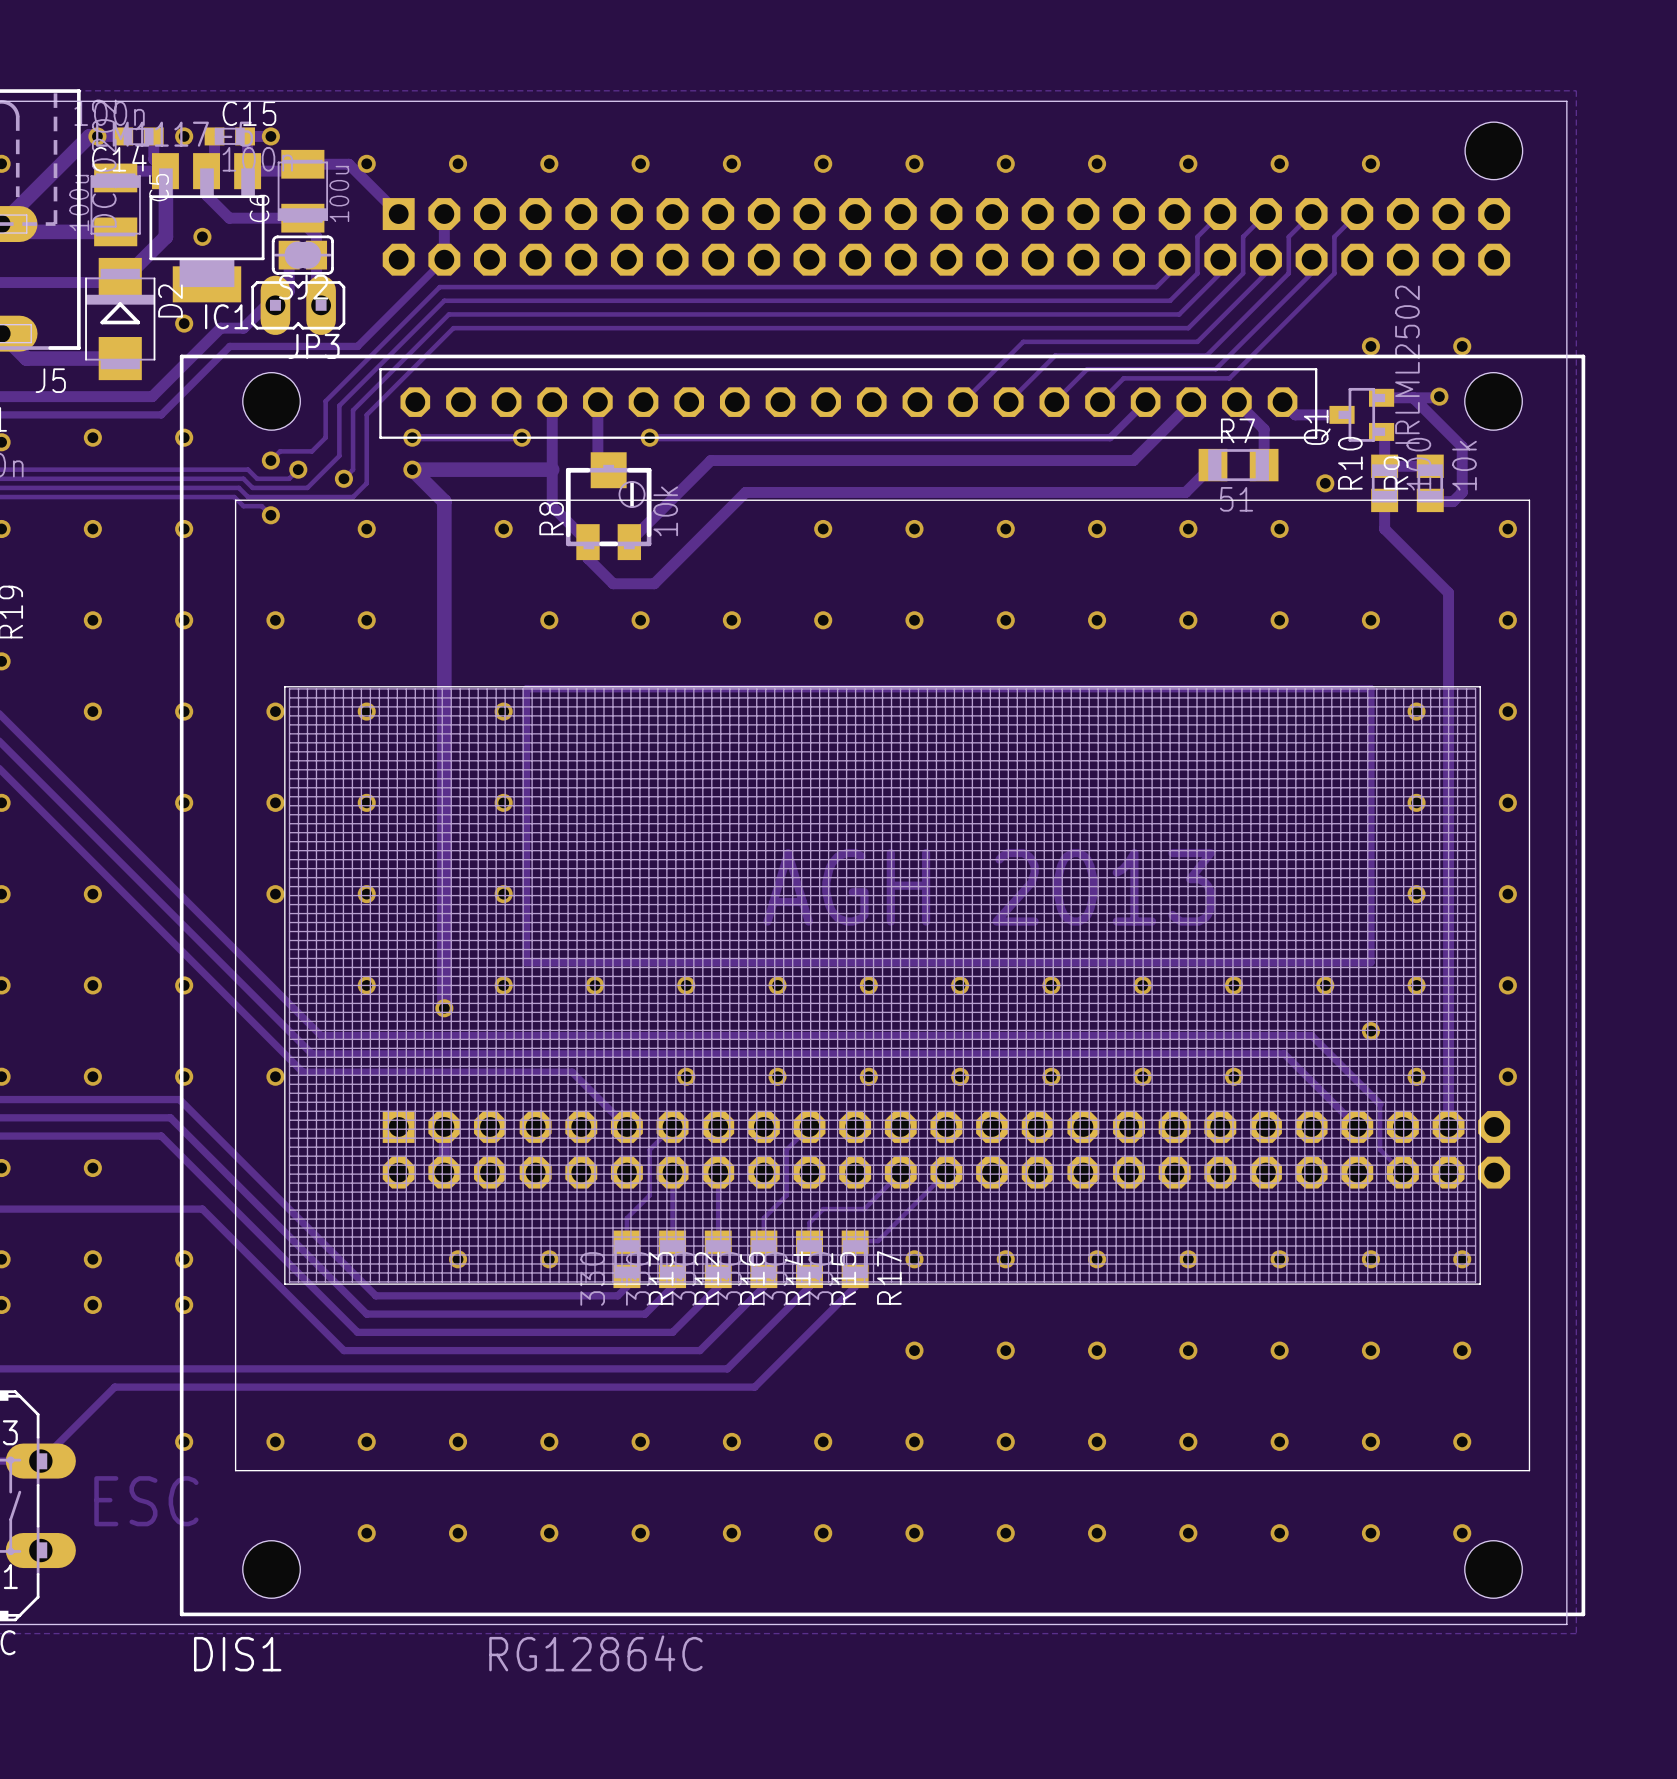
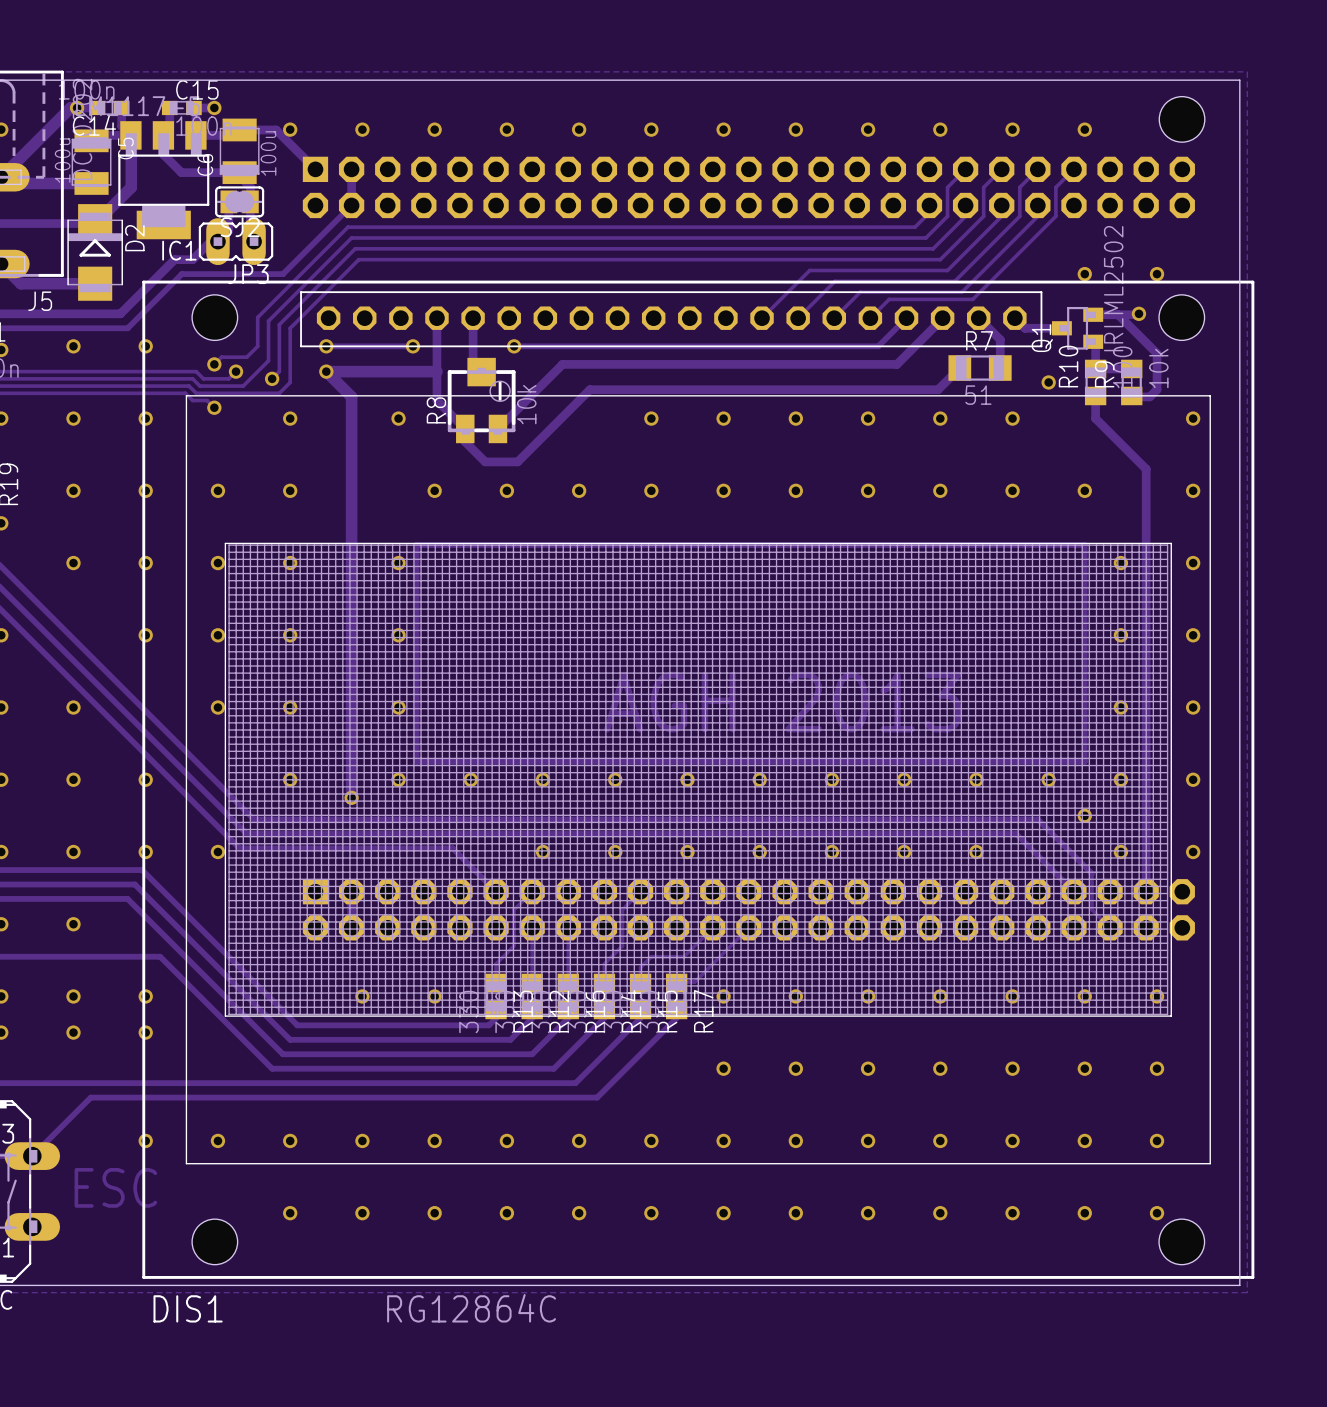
via: (184, 136) -> none
via: (202, 236) -> none
via: (184, 323) -> none

